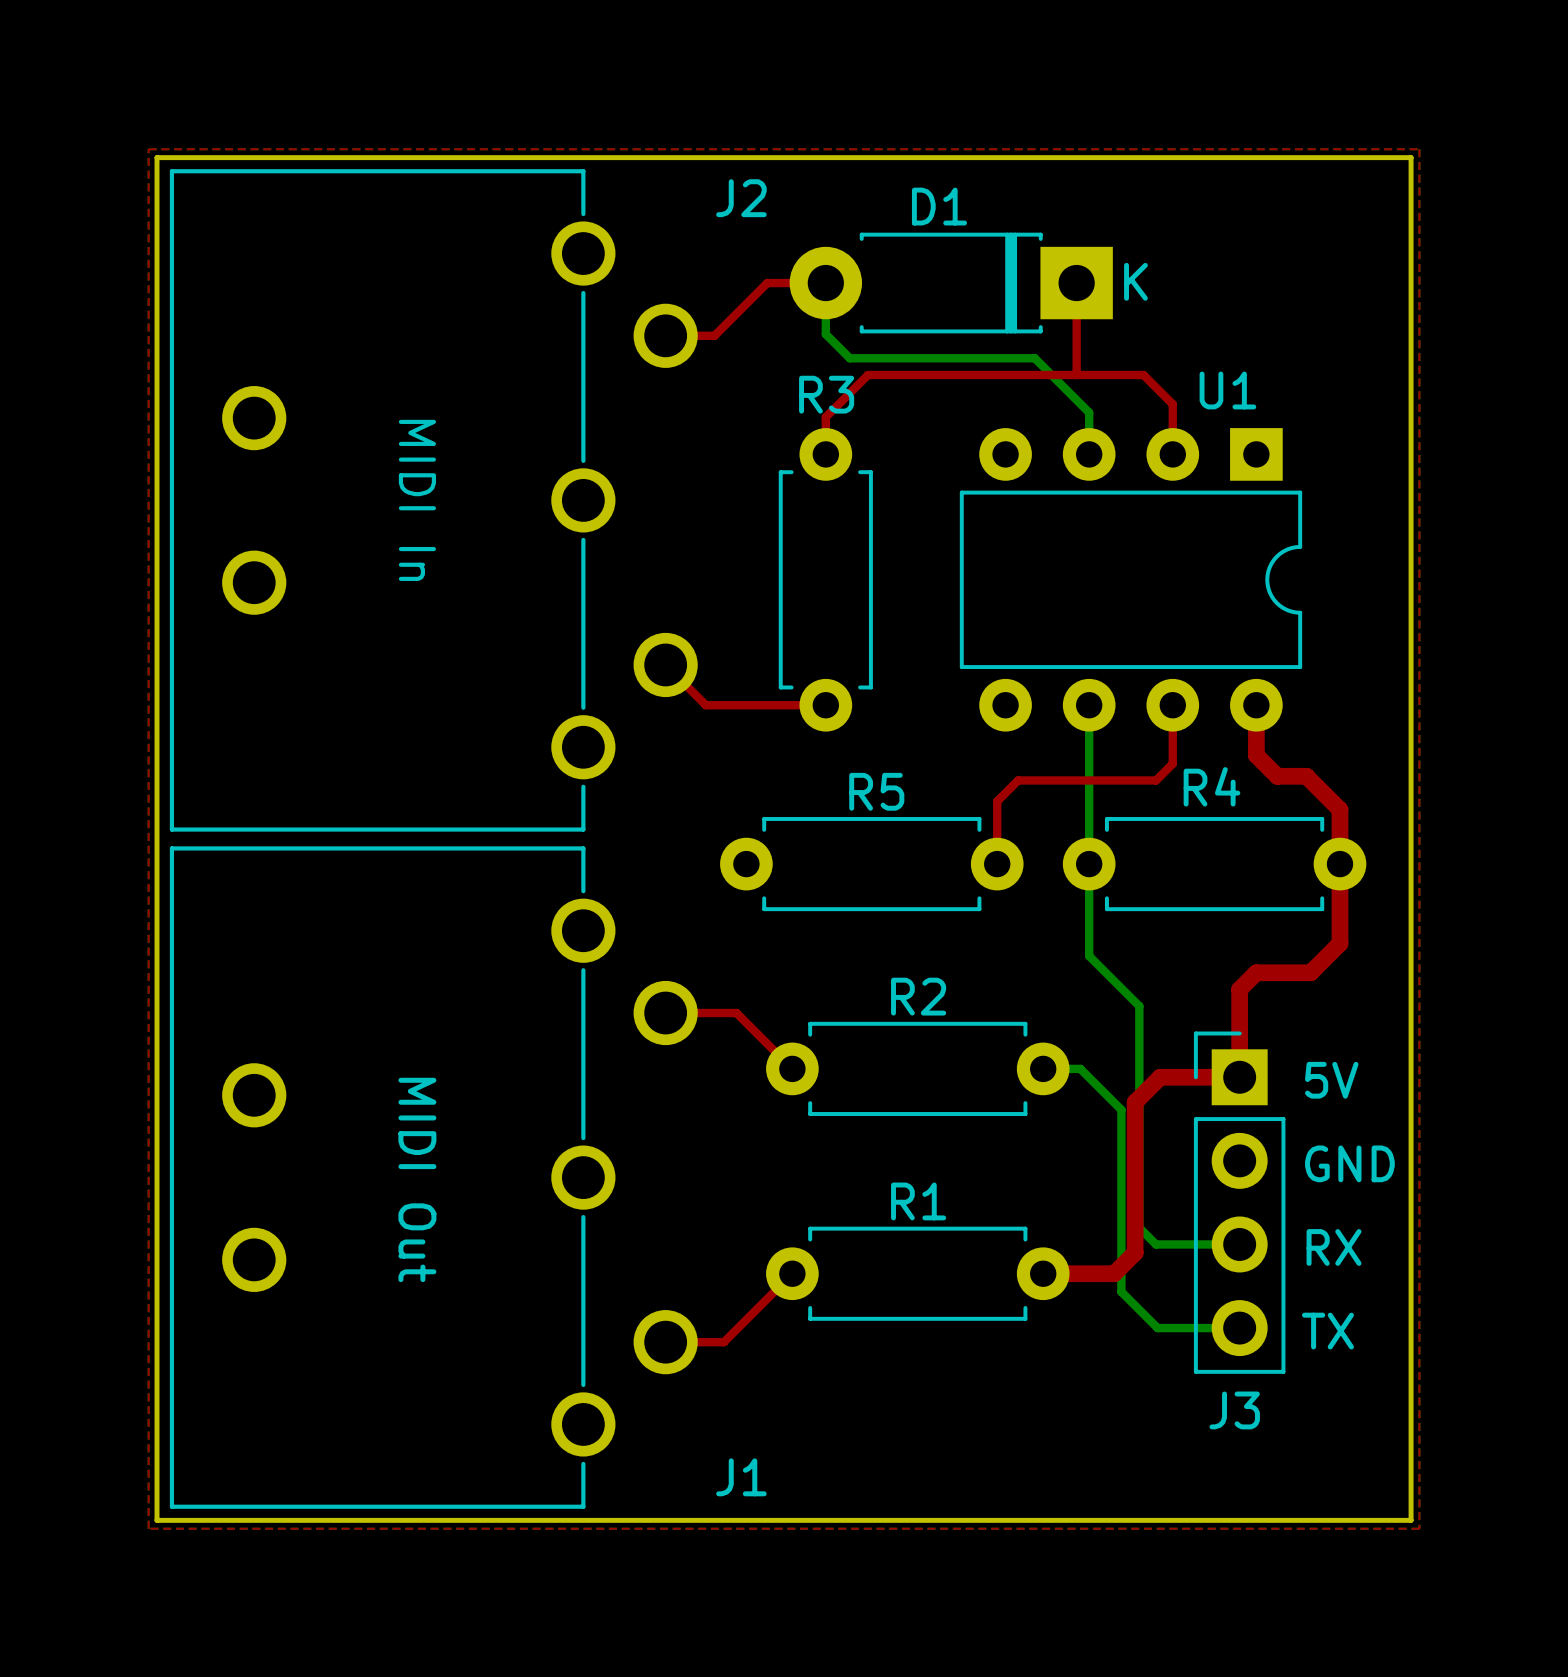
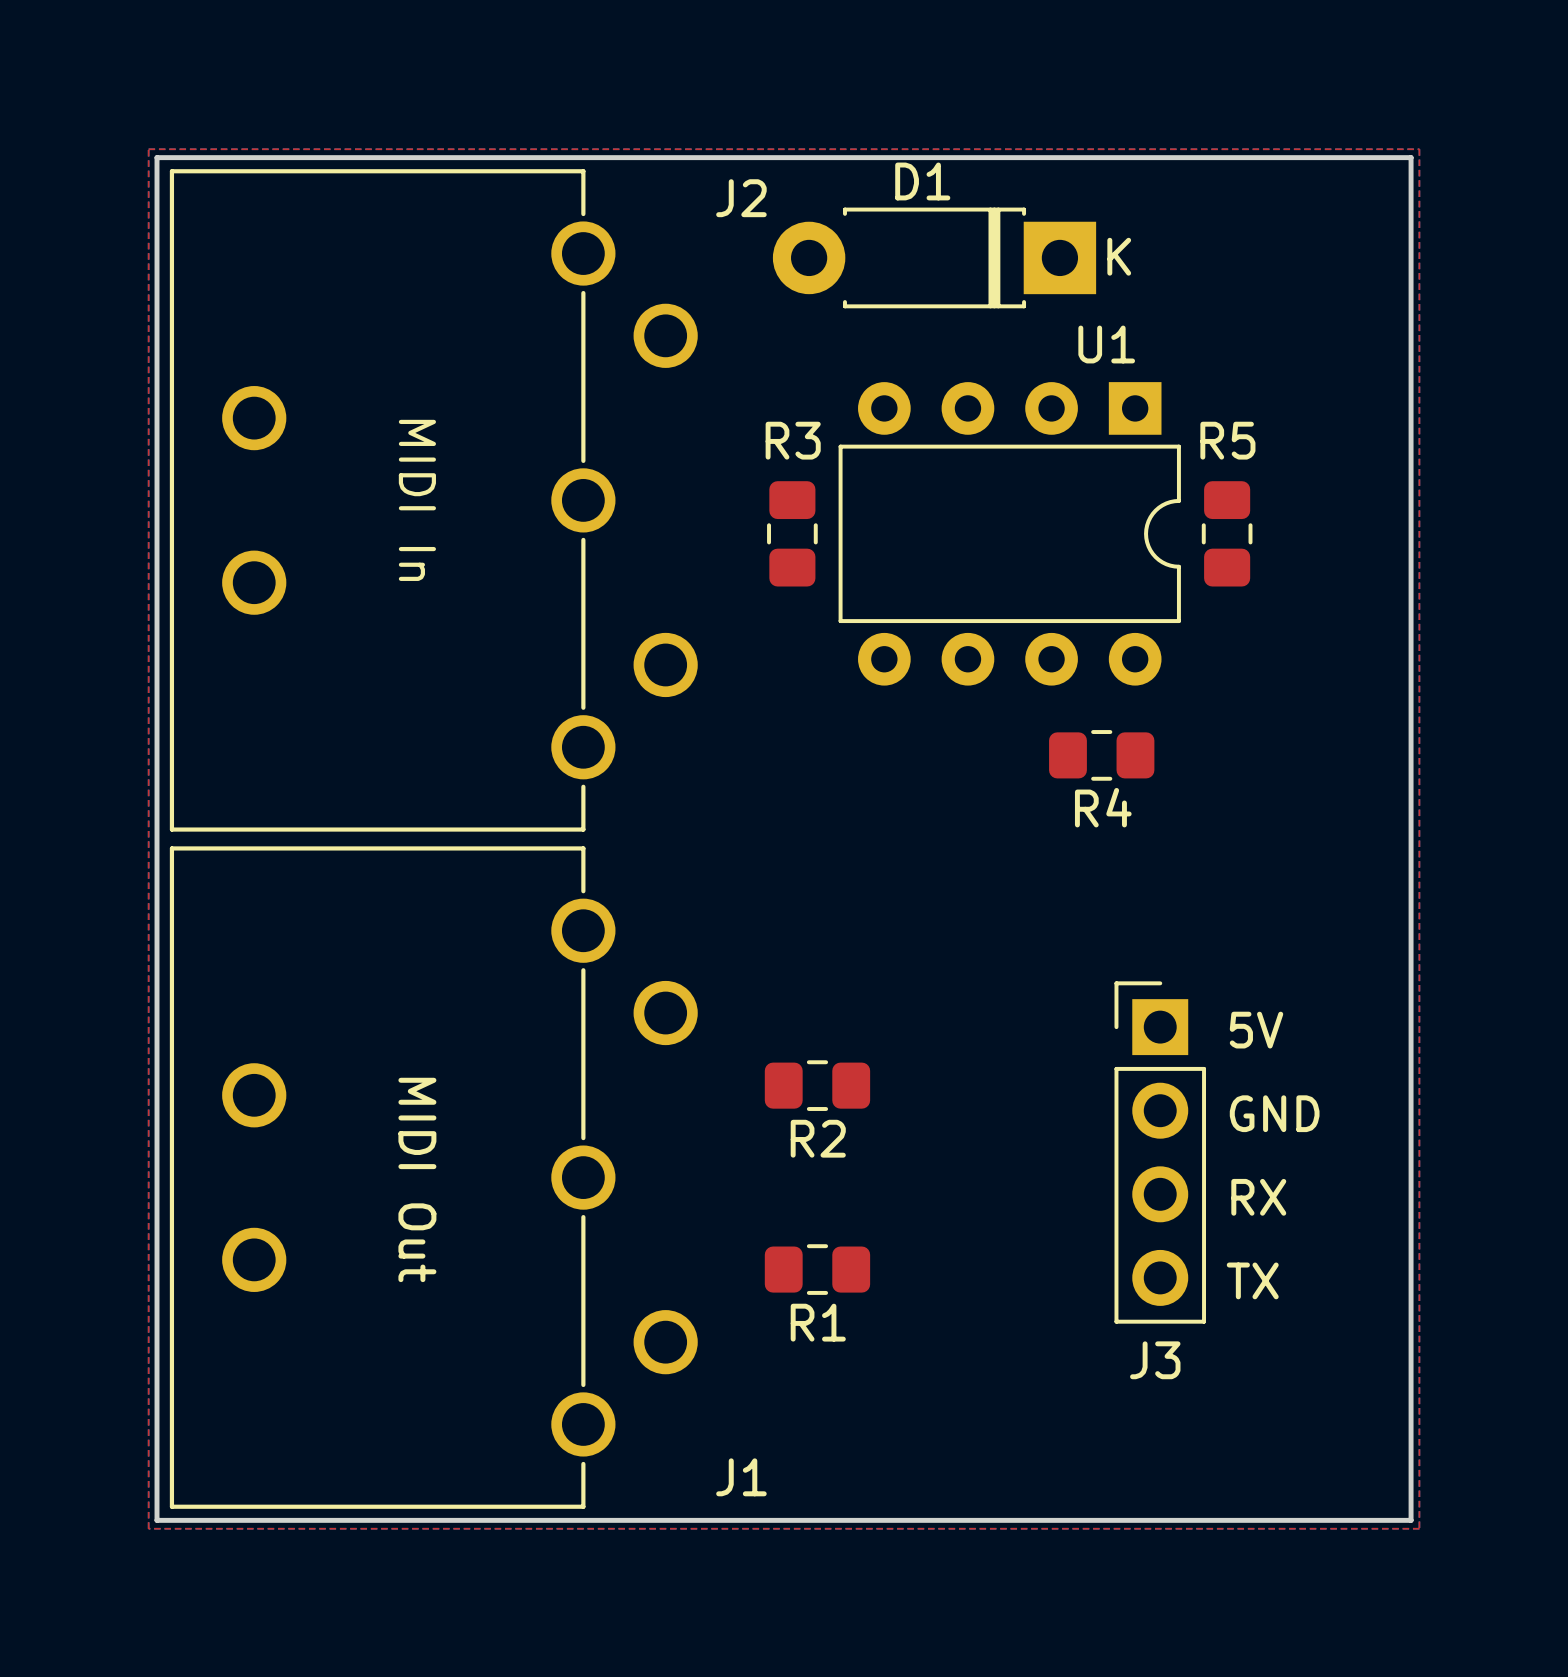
top track: (825, 283) (767, 283) (714, 335) (665, 335) -> none
bottom track: (825, 283) (825, 334) (849, 358) (1034, 358) (1089, 412) (1089, 454) -> none
D1 position: (951, 283) -> (934, 257)
top track: (1076, 283) (1076, 374) -> none
R3 name position: R3 (826, 394) -> R3 (793, 440)
R3 footprint: [778, 428, 873, 732] -> [767, 481, 818, 587]
top track: (825, 454) (825, 417) (868, 374) (1143, 374) (1172, 404) (1172, 454) -> none
U1 position: (1130, 579) -> (1009, 533)
top track: (665, 664) (705, 705) (825, 705) -> none
bottom track: (1089, 705) (1089, 956) (1139, 1006) (1139, 1227) (1156, 1244) (1239, 1244) -> none
top track: (1172, 705) (1172, 763) (1156, 780) (1018, 780) (997, 801) (997, 864) -> none
top track: (1256, 705) (1256, 755) (1277, 776) (1306, 776) (1339, 809) (1339, 943) (1310, 972) (1256, 972) (1239, 989) (1239, 1077) (1160, 1077) (1135, 1102) (1135, 1252) (1114, 1273) (1043, 1273) -> none
R4 name position: R4 (1211, 786) -> R4 (1103, 807)
R5 footprint: [720, 817, 1024, 912] -> [1201, 481, 1253, 587]
R4 footprint: [1062, 817, 1367, 912] -> [1049, 730, 1155, 781]
R2 name position: R2 (918, 996) -> R2 (818, 1138)
top track: (665, 1013) (736, 1013) (792, 1068) -> none
R2 footprint: [766, 1021, 1070, 1116] -> [764, 1060, 871, 1111]
bottom track: (1043, 1068) (1080, 1068) (1121, 1109) (1121, 1291) (1157, 1328) (1239, 1328) -> none
text position: 5V (1331, 1080) -> 5V (1256, 1030)
text position: GND (1349, 1163) -> GND (1274, 1113)
R1 name position: R1 (918, 1201) -> R1 (818, 1322)
J3 position: (1239, 1202) -> (1160, 1152)
R1 footprint: [766, 1226, 1070, 1321] -> [764, 1244, 871, 1295]
text position: RX (1334, 1247) -> RX (1258, 1197)
top track: (792, 1273) (723, 1342) (665, 1342) -> none
text position: TX (1327, 1331) -> TX (1252, 1280)

